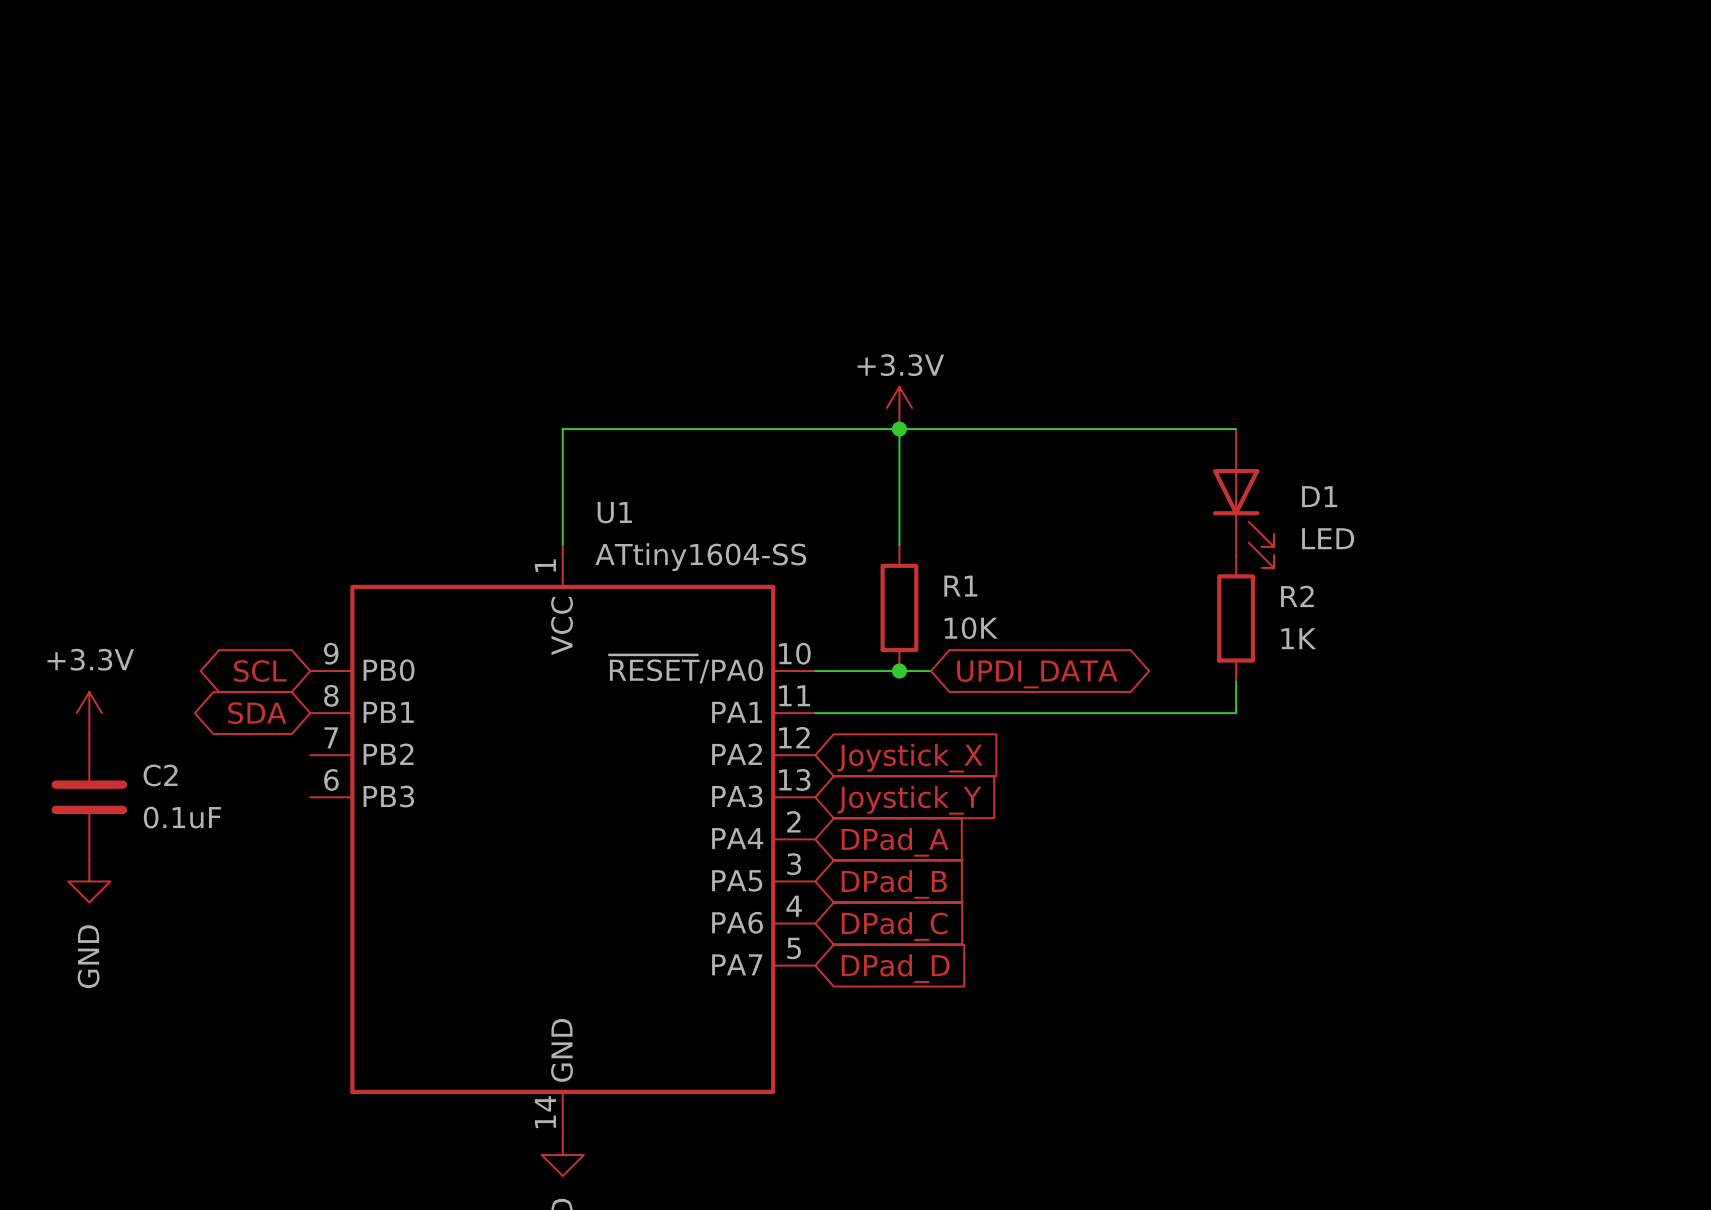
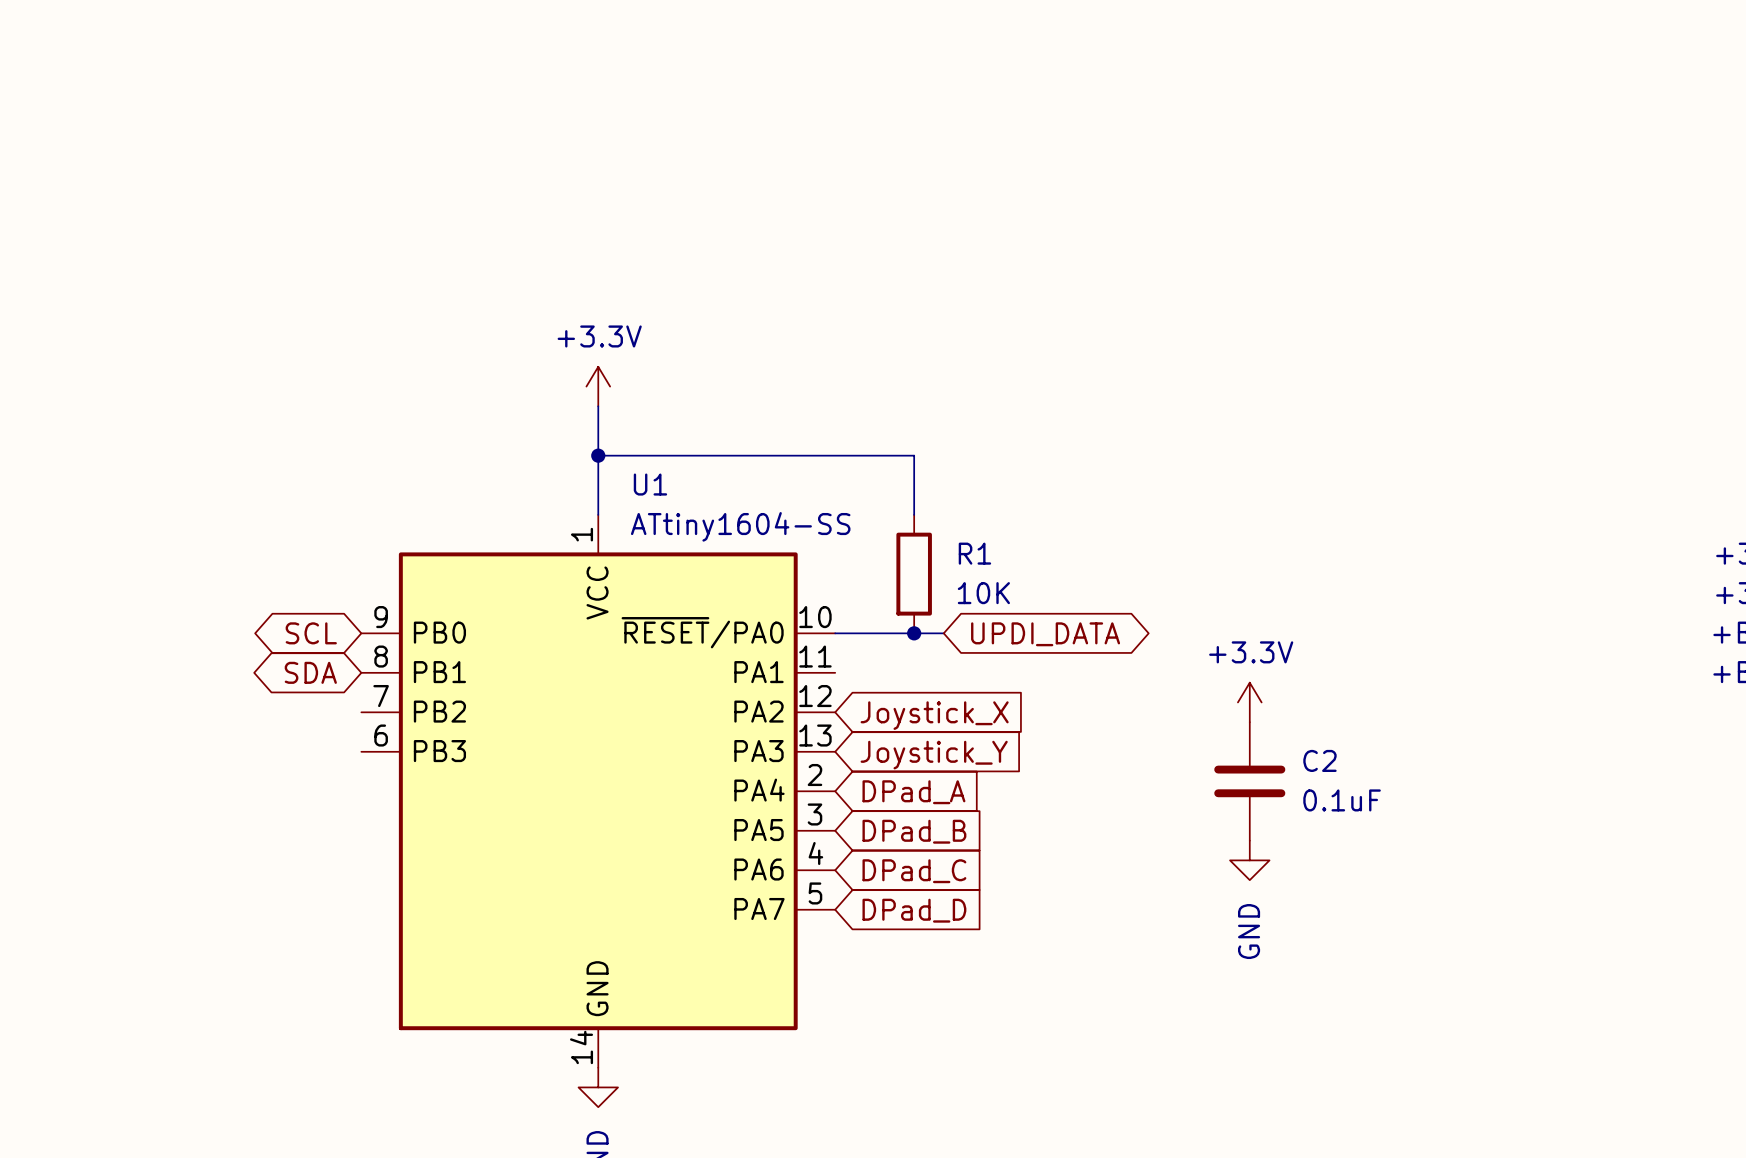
power symbol: none -> +3.3V (598, 386)
power symbol: +3.3V (899, 408) -> none
wire: (562, 429) (1236, 429) -> none
wire: (899, 429) (899, 481) -> (598, 455) (914, 455)
junction: (899, 429) -> none
junction: none -> (598, 455)
D1: LED (1243, 498) -> none
R2: 1K (1236, 618) -> none
wire: (1236, 681) (1236, 713) (815, 713) -> none
power symbol: +3.3V (89, 713) -> none
power symbol: none -> +3.3V (1249, 702)
C2 position: (89, 797) -> (1249, 781)
power symbol: GND (89, 881) -> none
power symbol: none -> GND (1249, 860)

